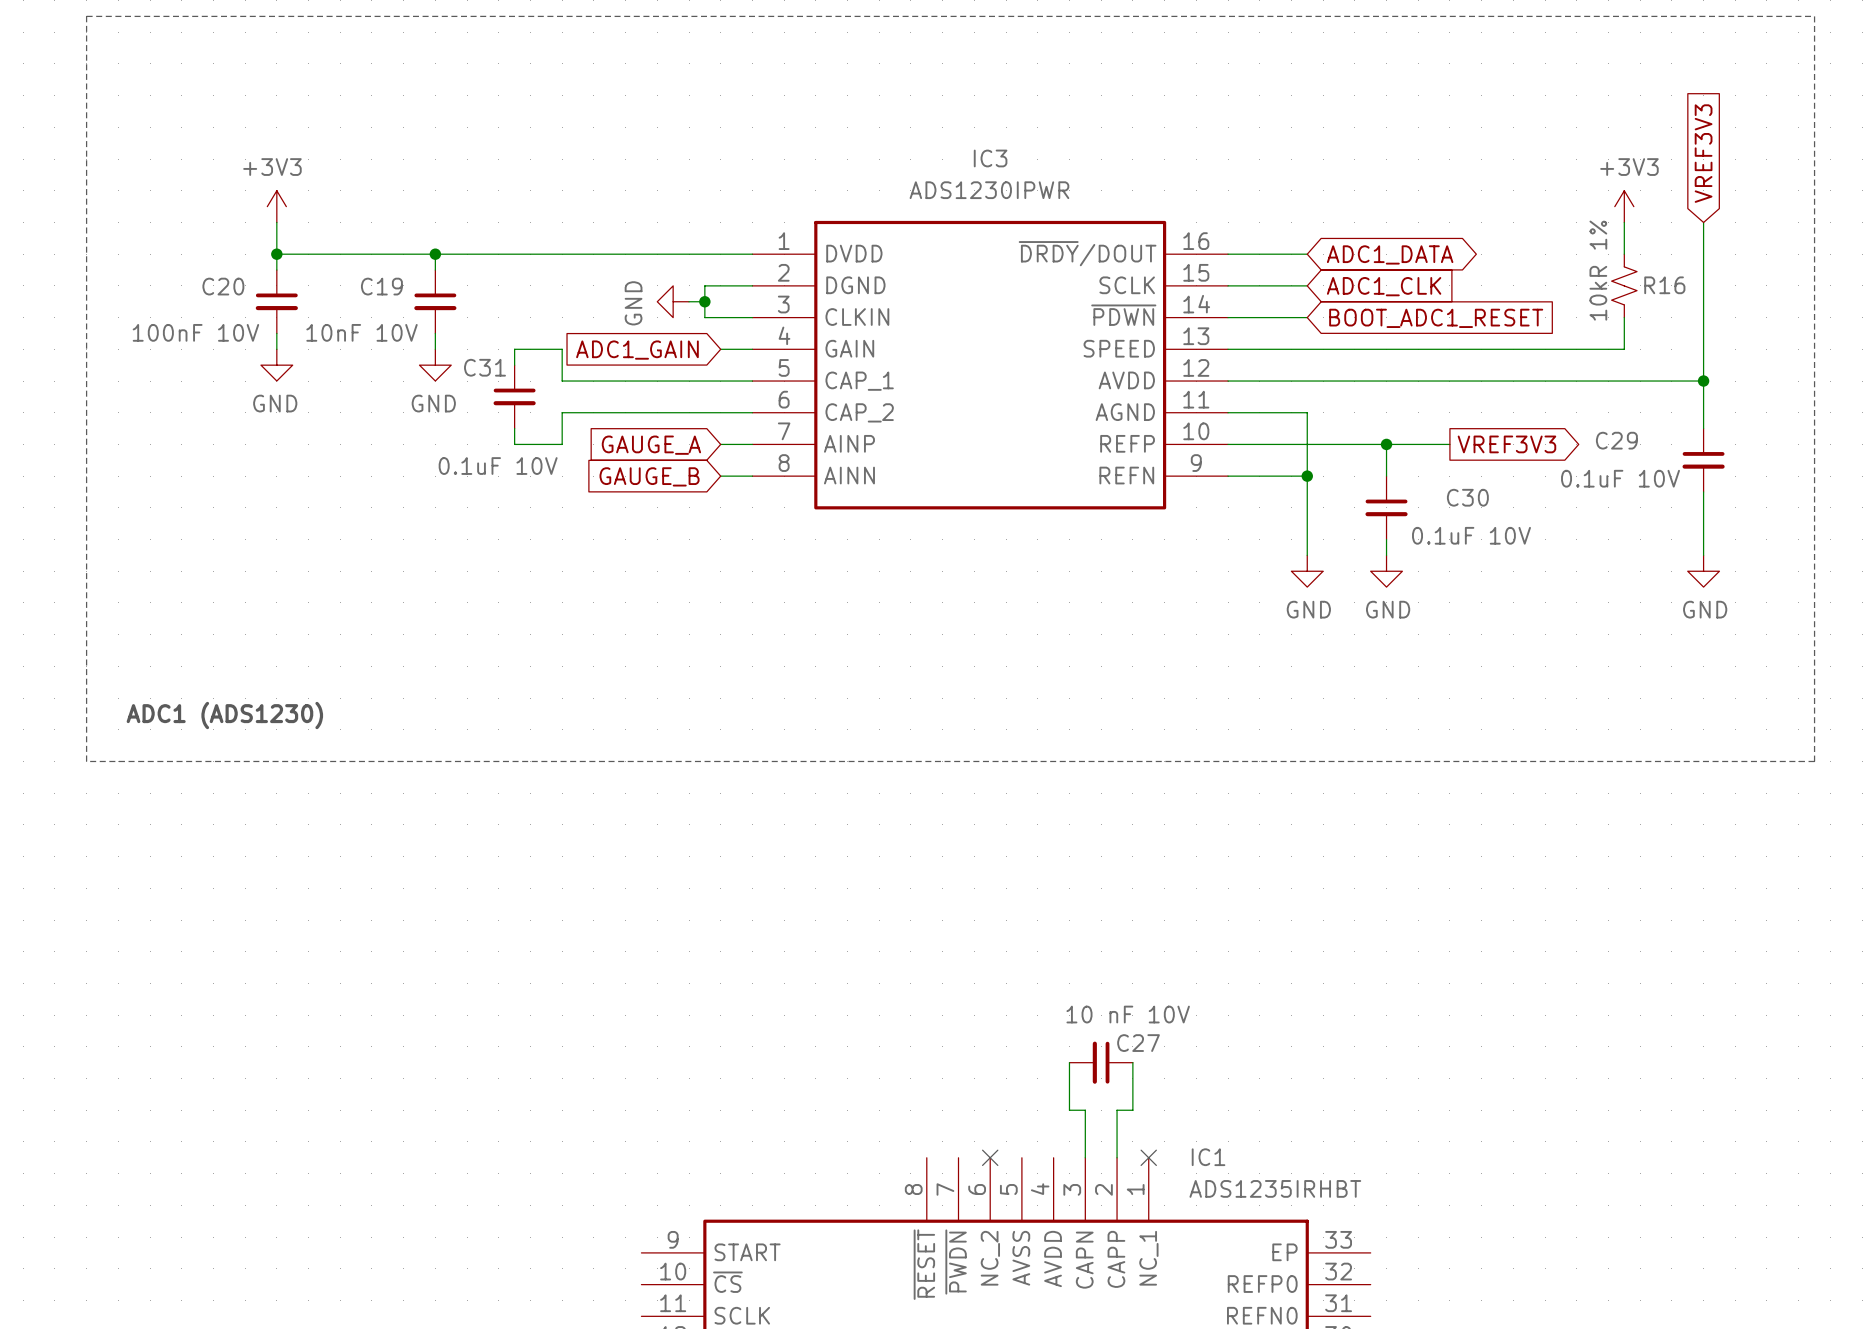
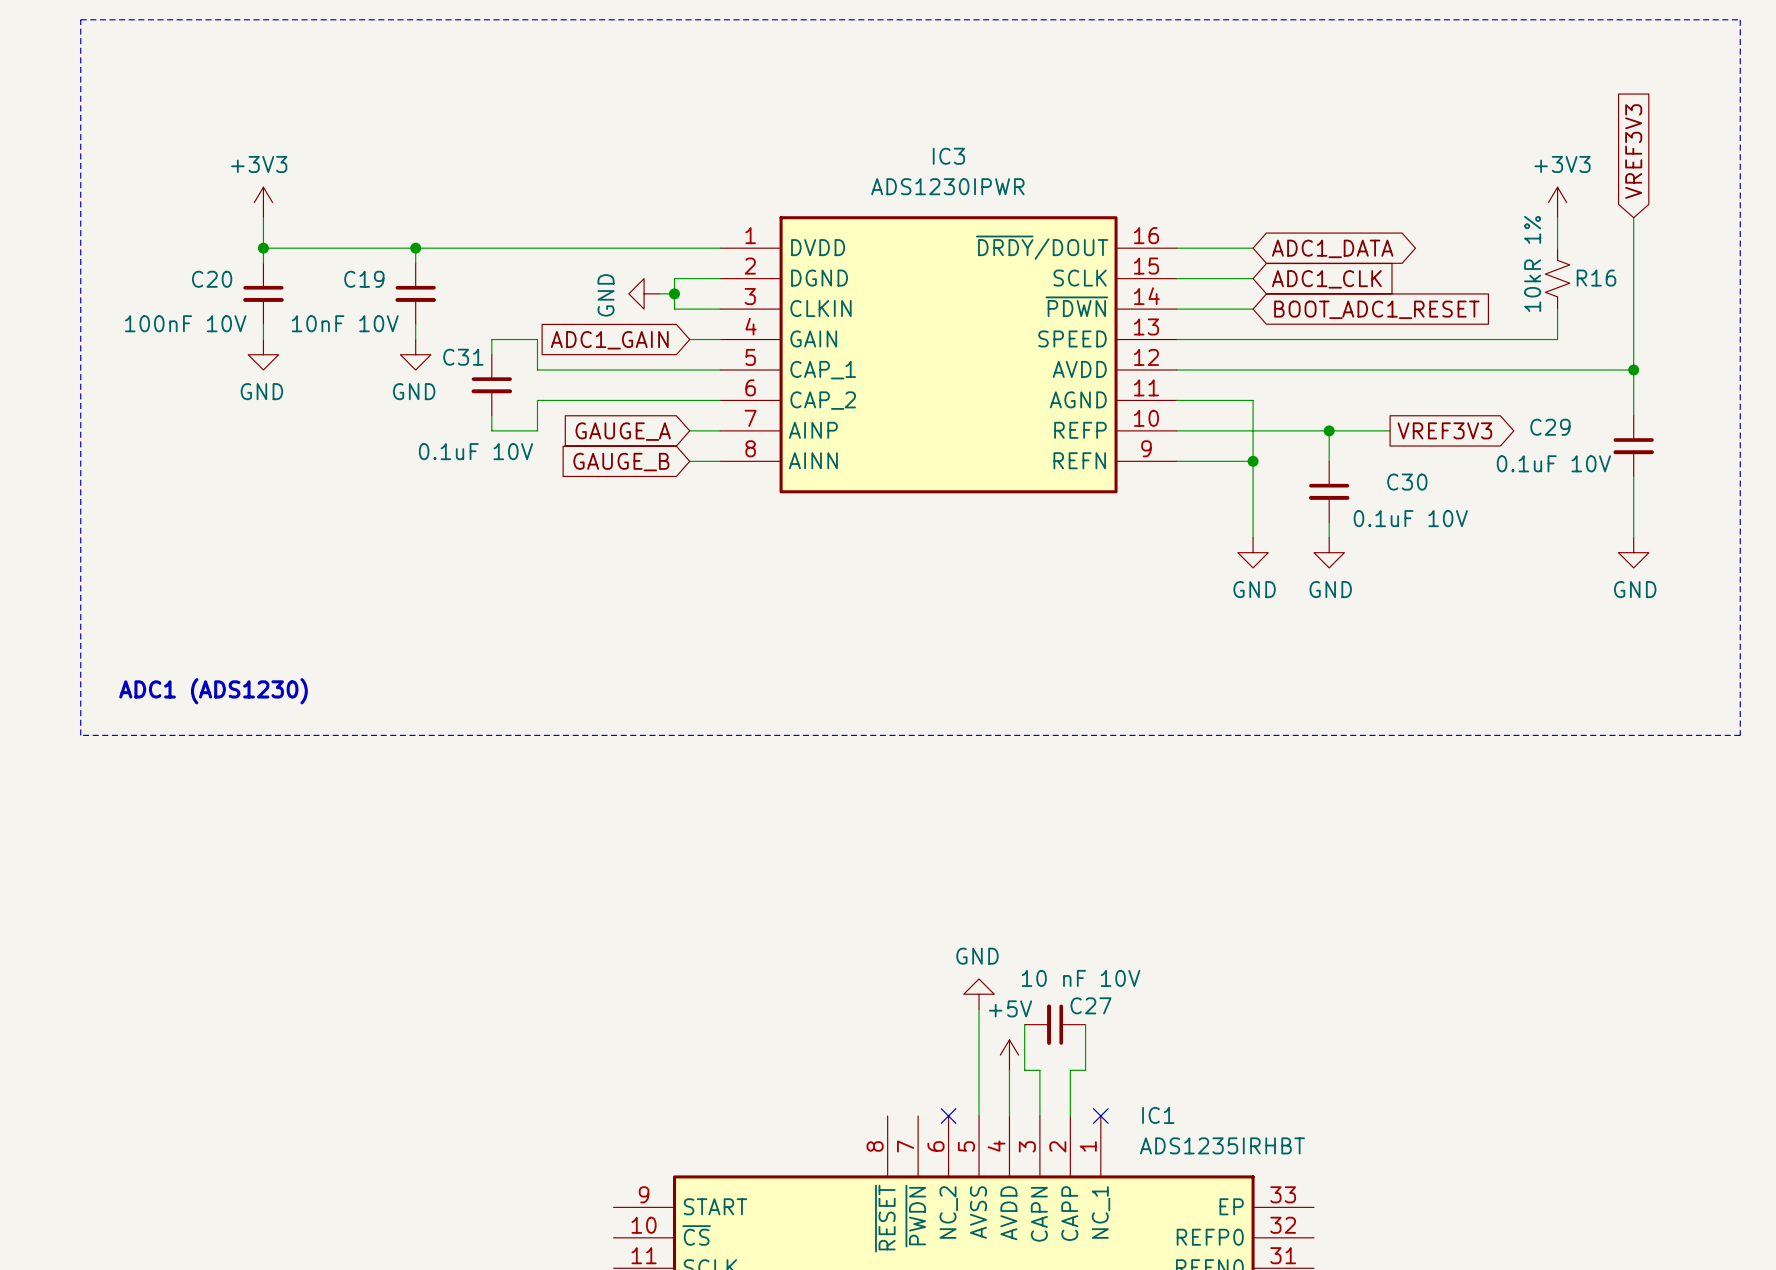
power symbol: none -> GND (979, 994)
wire: none -> (979, 1009) (979, 1116)
power symbol: none -> +5V (1009, 1055)
wire: none -> (1009, 1070) (1009, 1116)

